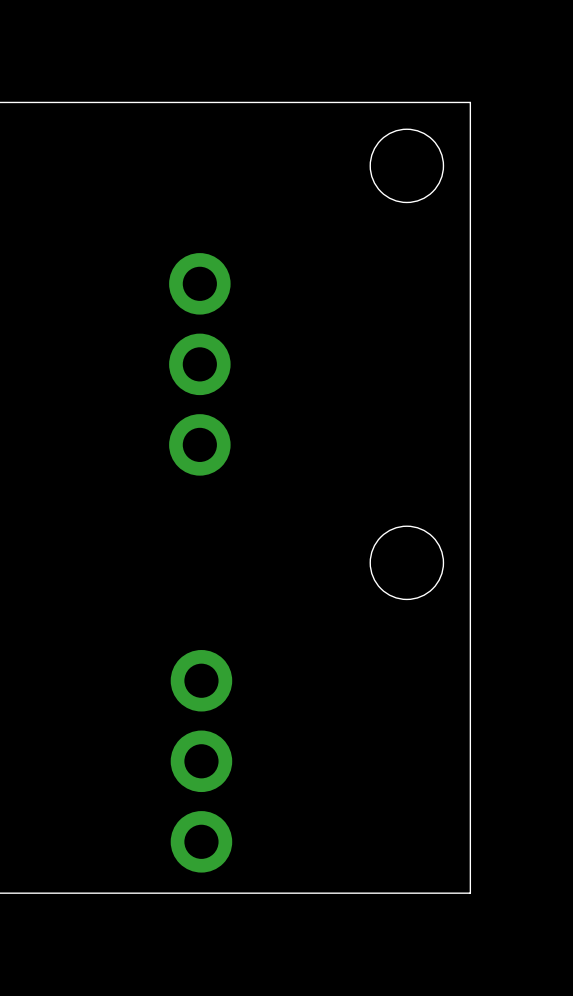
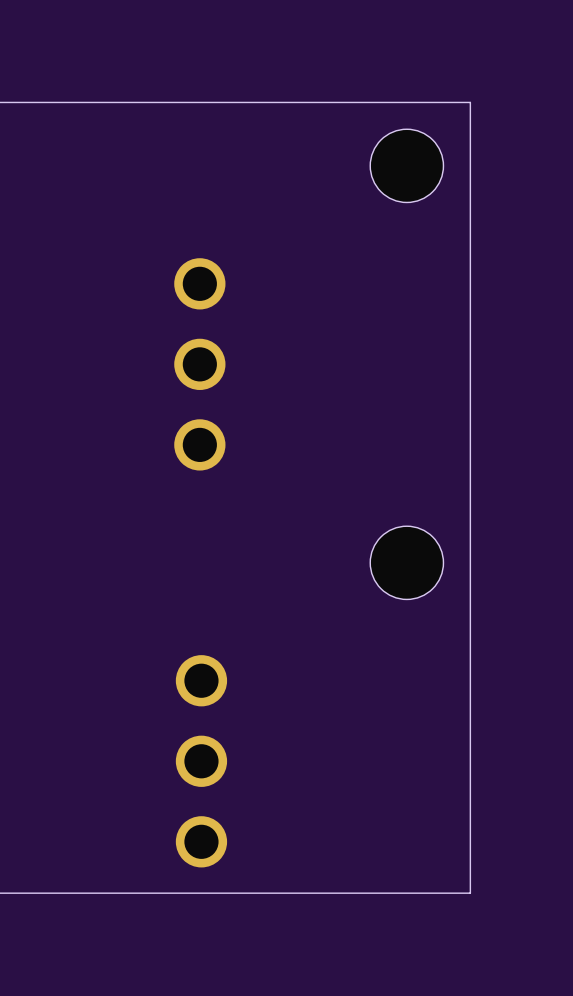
part footprint: [169, 253, 231, 476] -> [174, 258, 226, 471]
part footprint: [170, 650, 233, 873] -> [175, 655, 228, 868]

